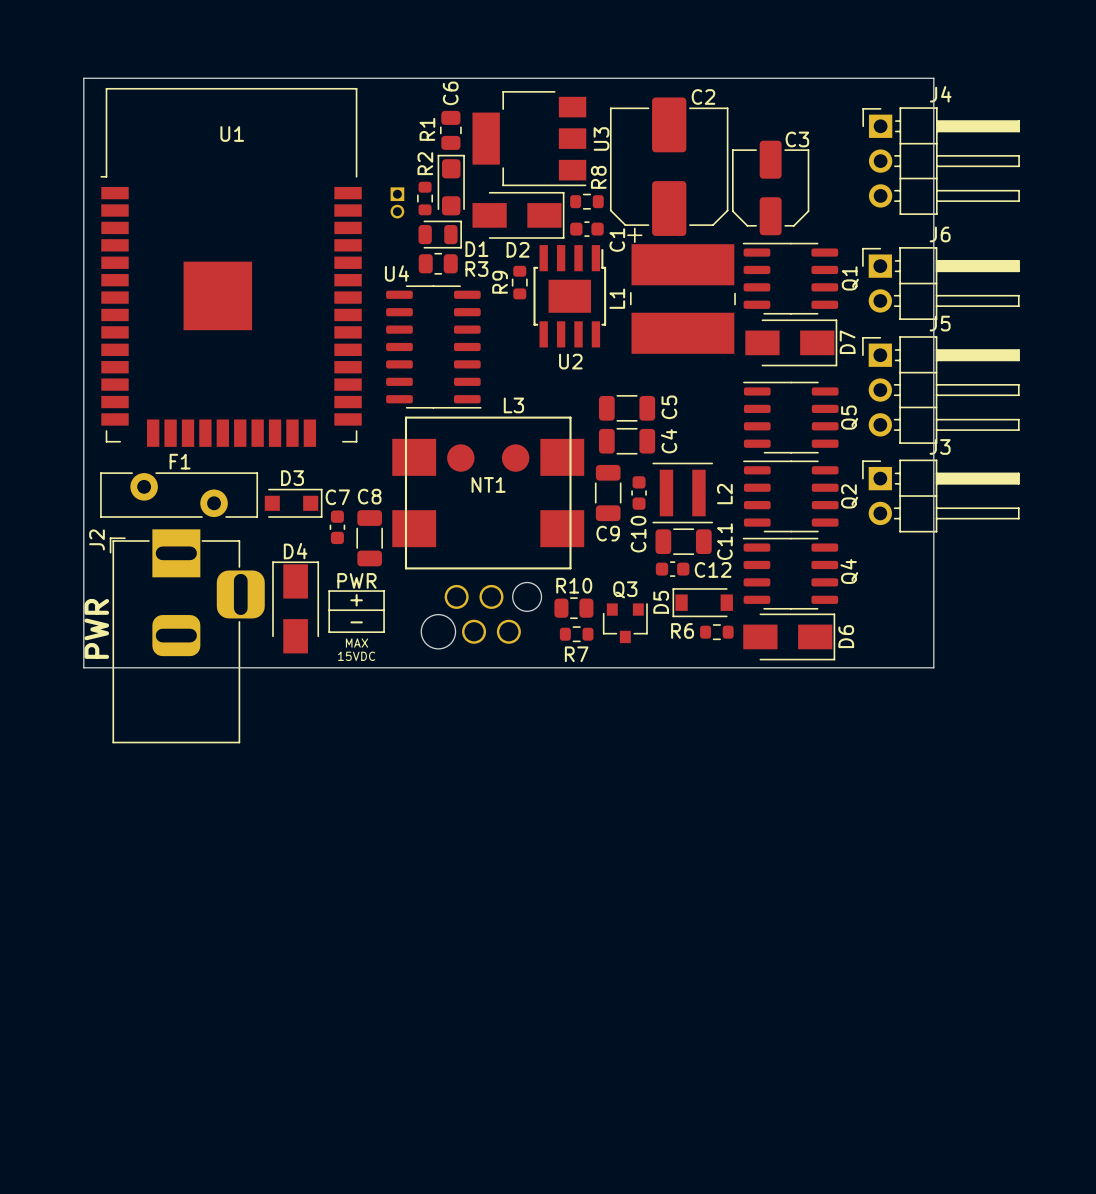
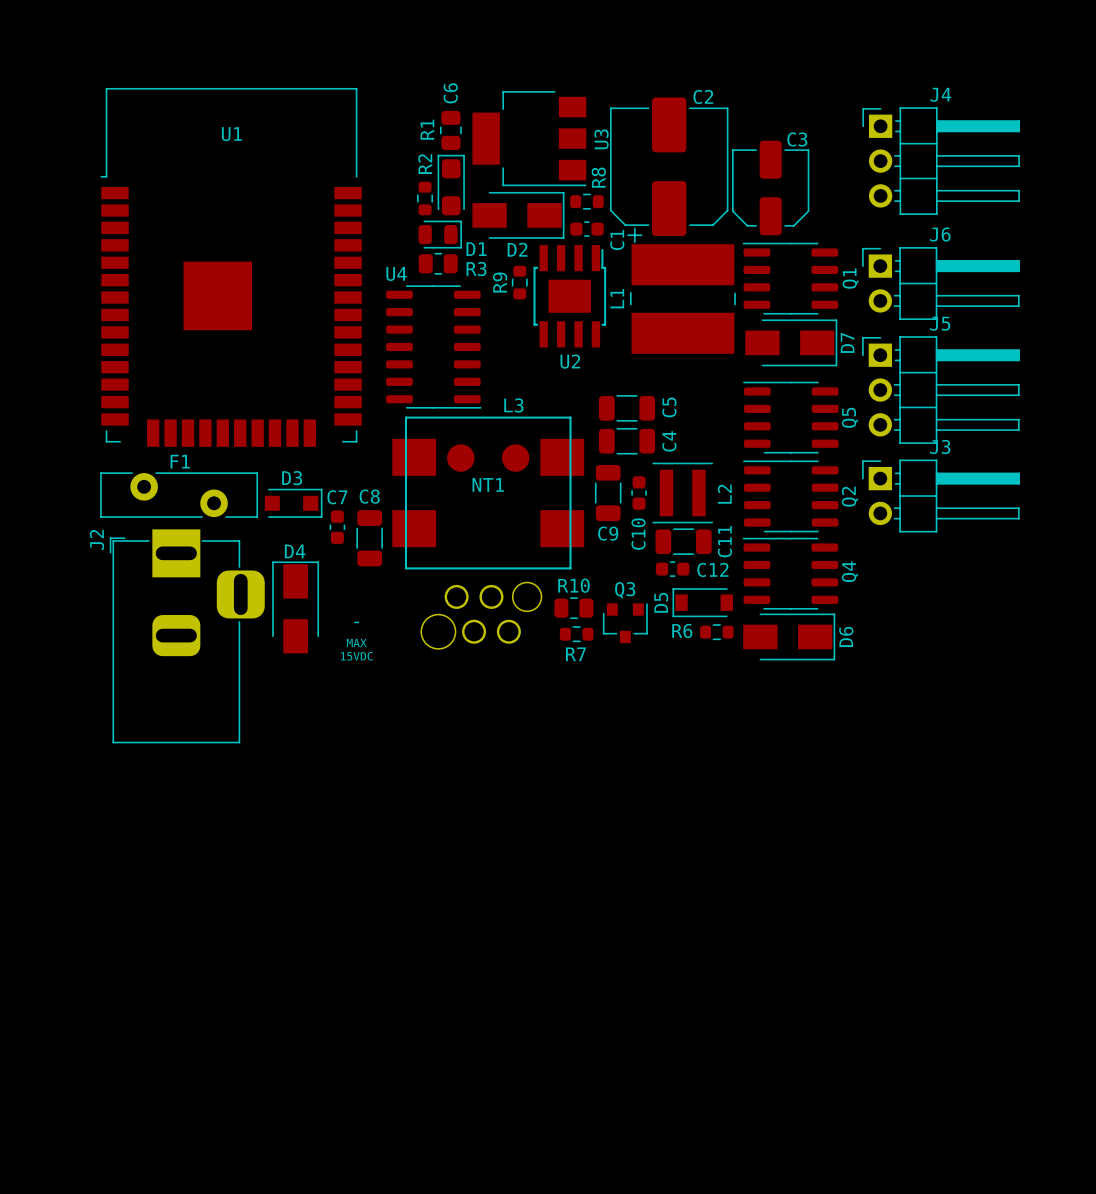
board edge: (83, 78) (83, 667) (933, 667) (933, 78) (83, 78) -> none
part: (397, 202) -> none
text: PWR (356, 580) -> none
line: (329, 591) (329, 632) (384, 632) (384, 591) (329, 591) -> none
text: + (356, 600) -> none
line: (329, 610) (384, 610) -> none
text: PWR (96, 628) -> none

